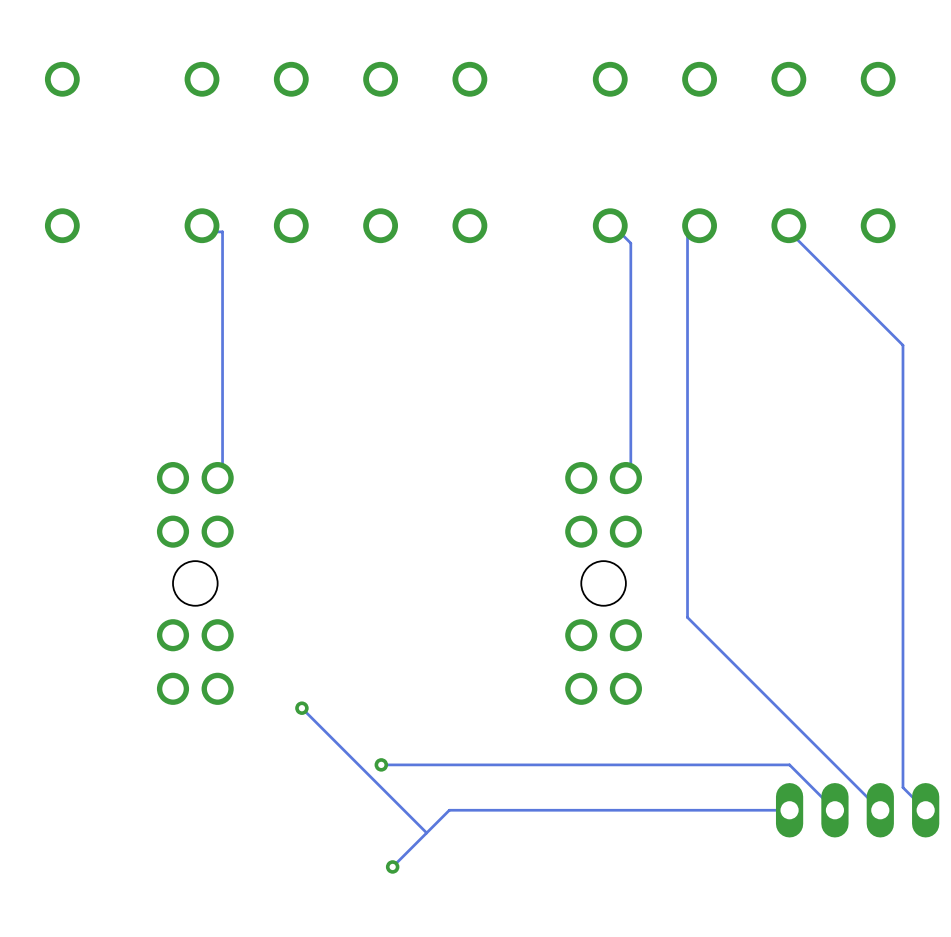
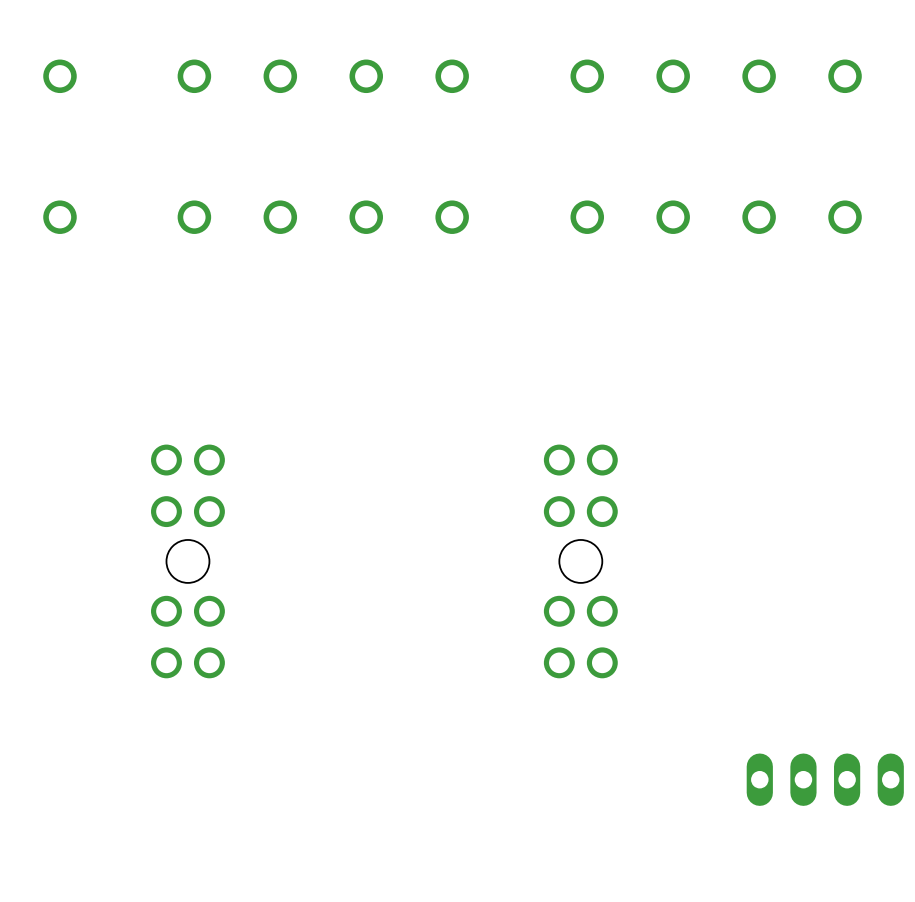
track: (202, 225) (211, 231) (222, 231) (222, 470) (217, 478) -> none
track: (610, 225) (630, 243) (630, 470) (625, 478) -> none
track: (699, 225) (698, 231) (687, 231) (687, 617) (880, 810) -> none
track: (788, 225) (789, 231) (902, 345) (902, 787) (925, 810) -> none
track: (301, 708) (426, 832) -> none
via: (301, 708) -> none
track: (381, 764) (789, 764) (834, 810) -> none
via: (381, 764) -> none
track: (789, 810) (449, 810) (392, 866) -> none
via: (392, 866) -> none

